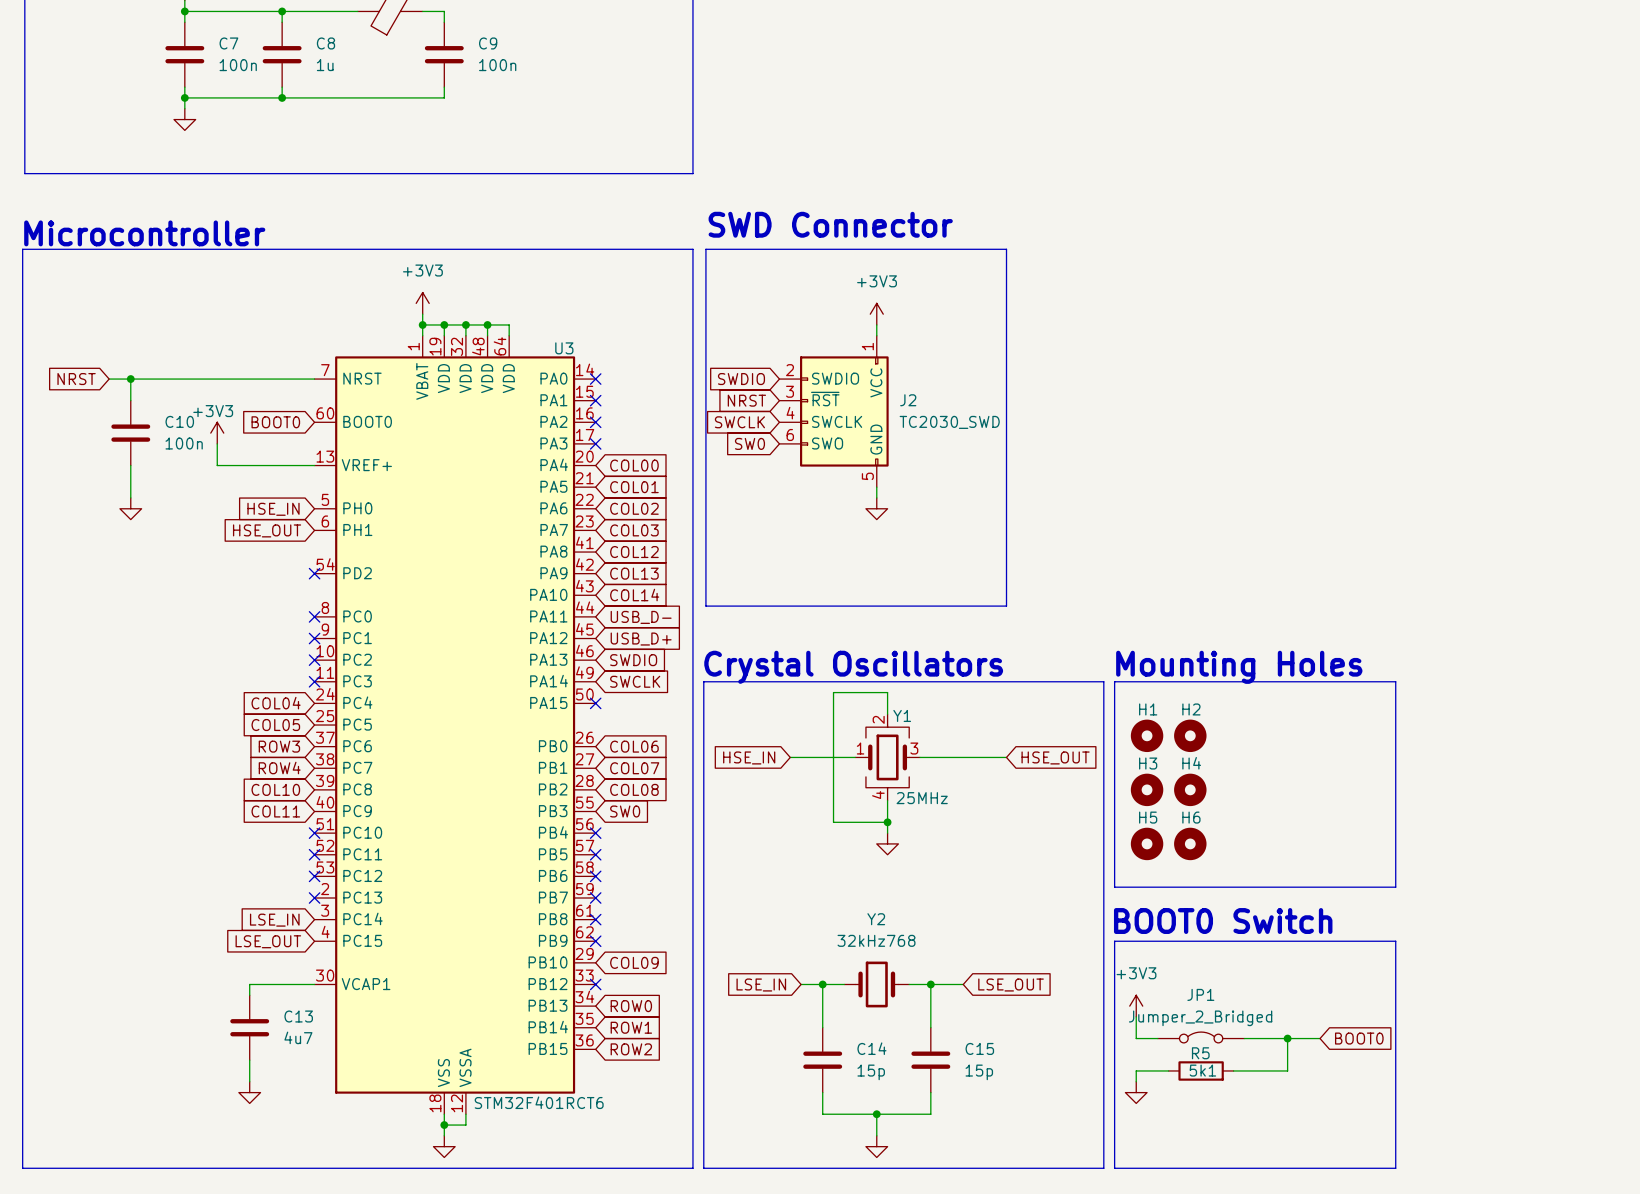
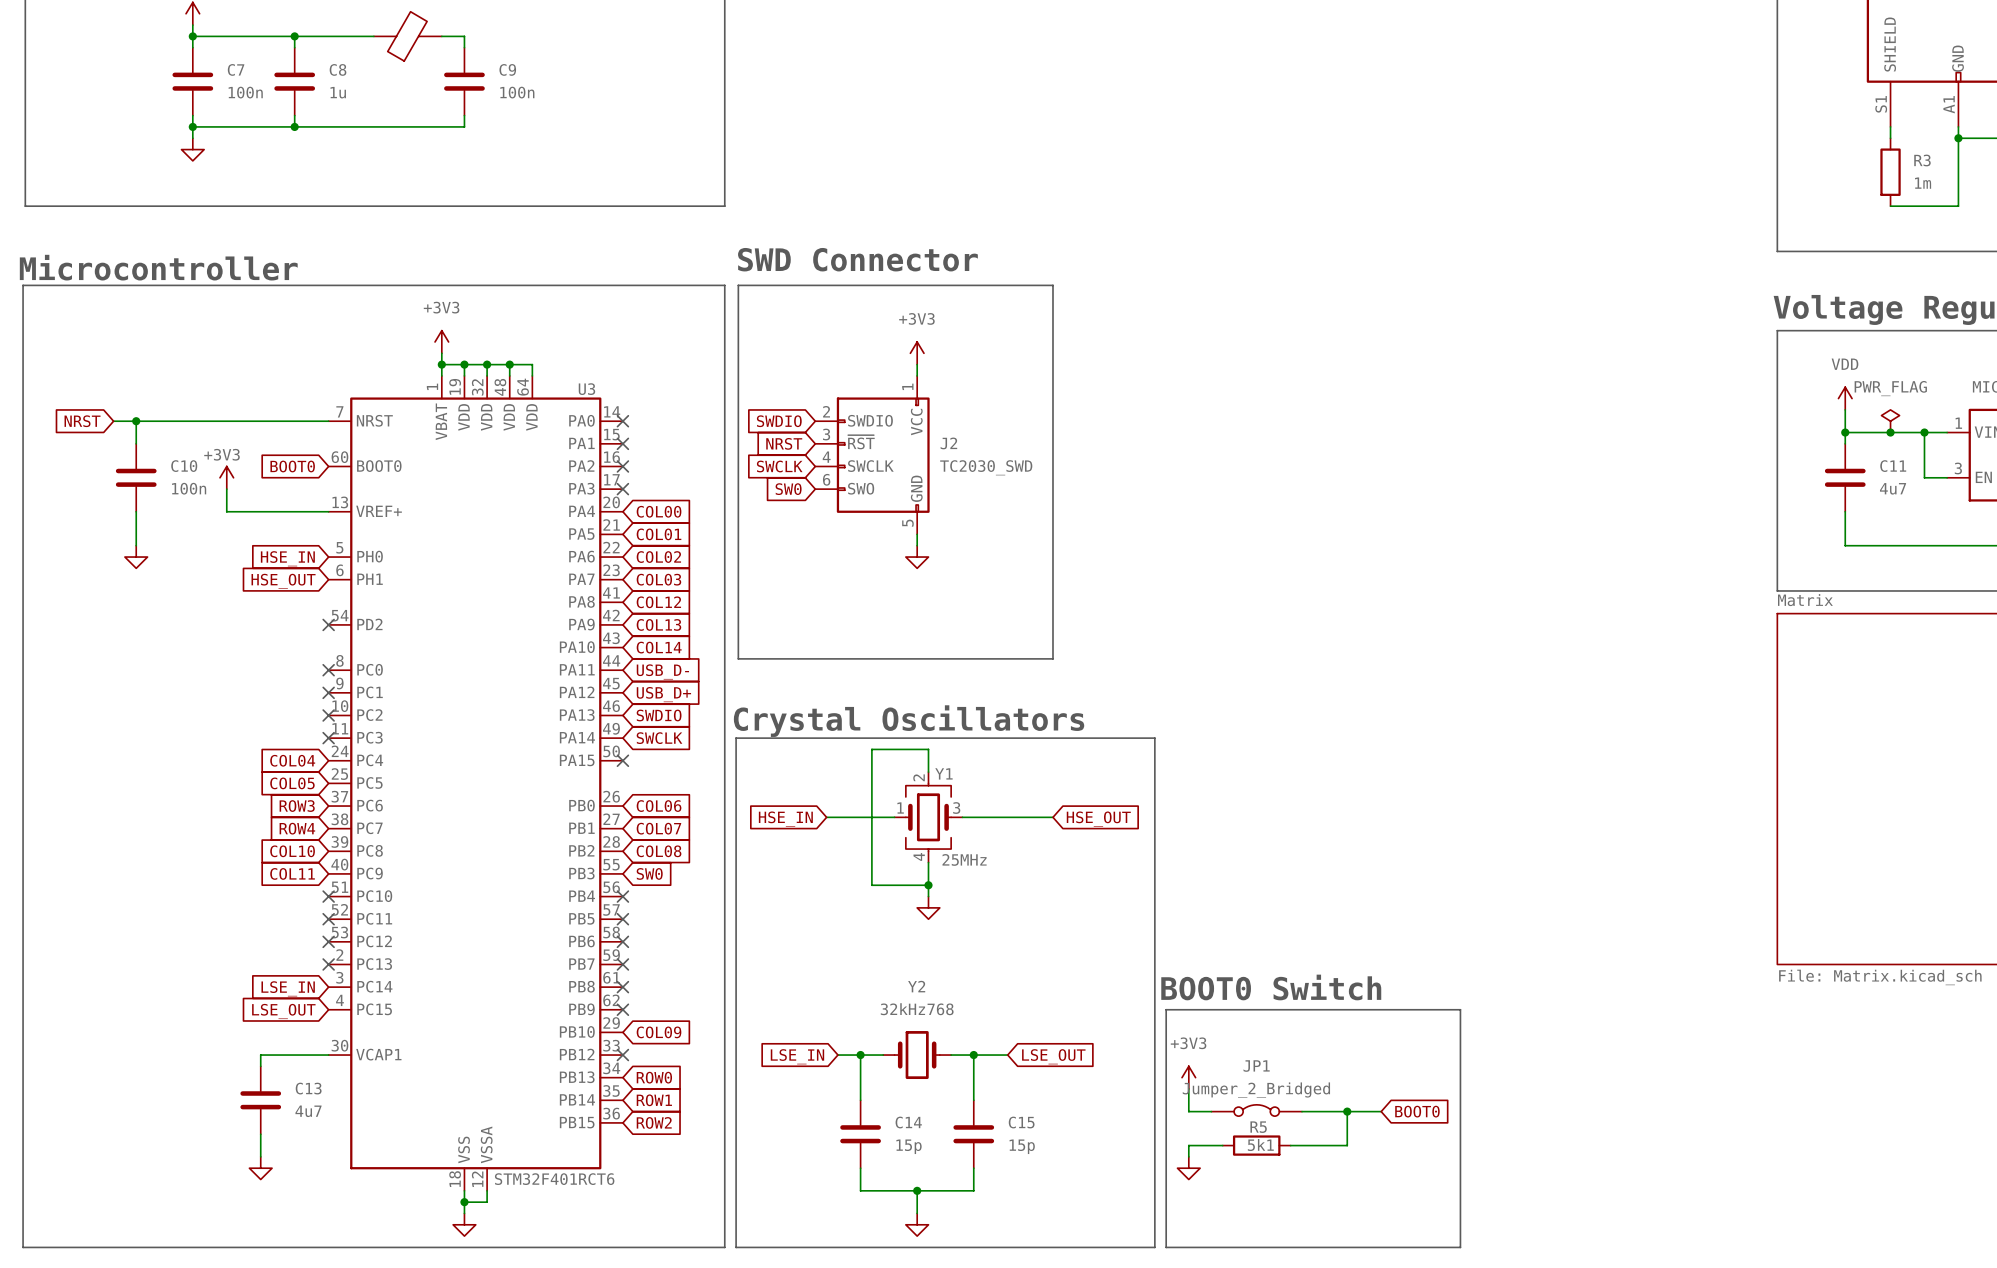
text: Mounting Holes (1239, 667) -> none
line: (1114, 681) (1395, 681) (1395, 887) (1114, 887) (1114, 681) -> none
H1: (1147, 735) -> none
H2: (1190, 735) -> none
H3: (1147, 789) -> none
H4: (1190, 789) -> none
H5: (1147, 843) -> none
H6: (1190, 843) -> none

